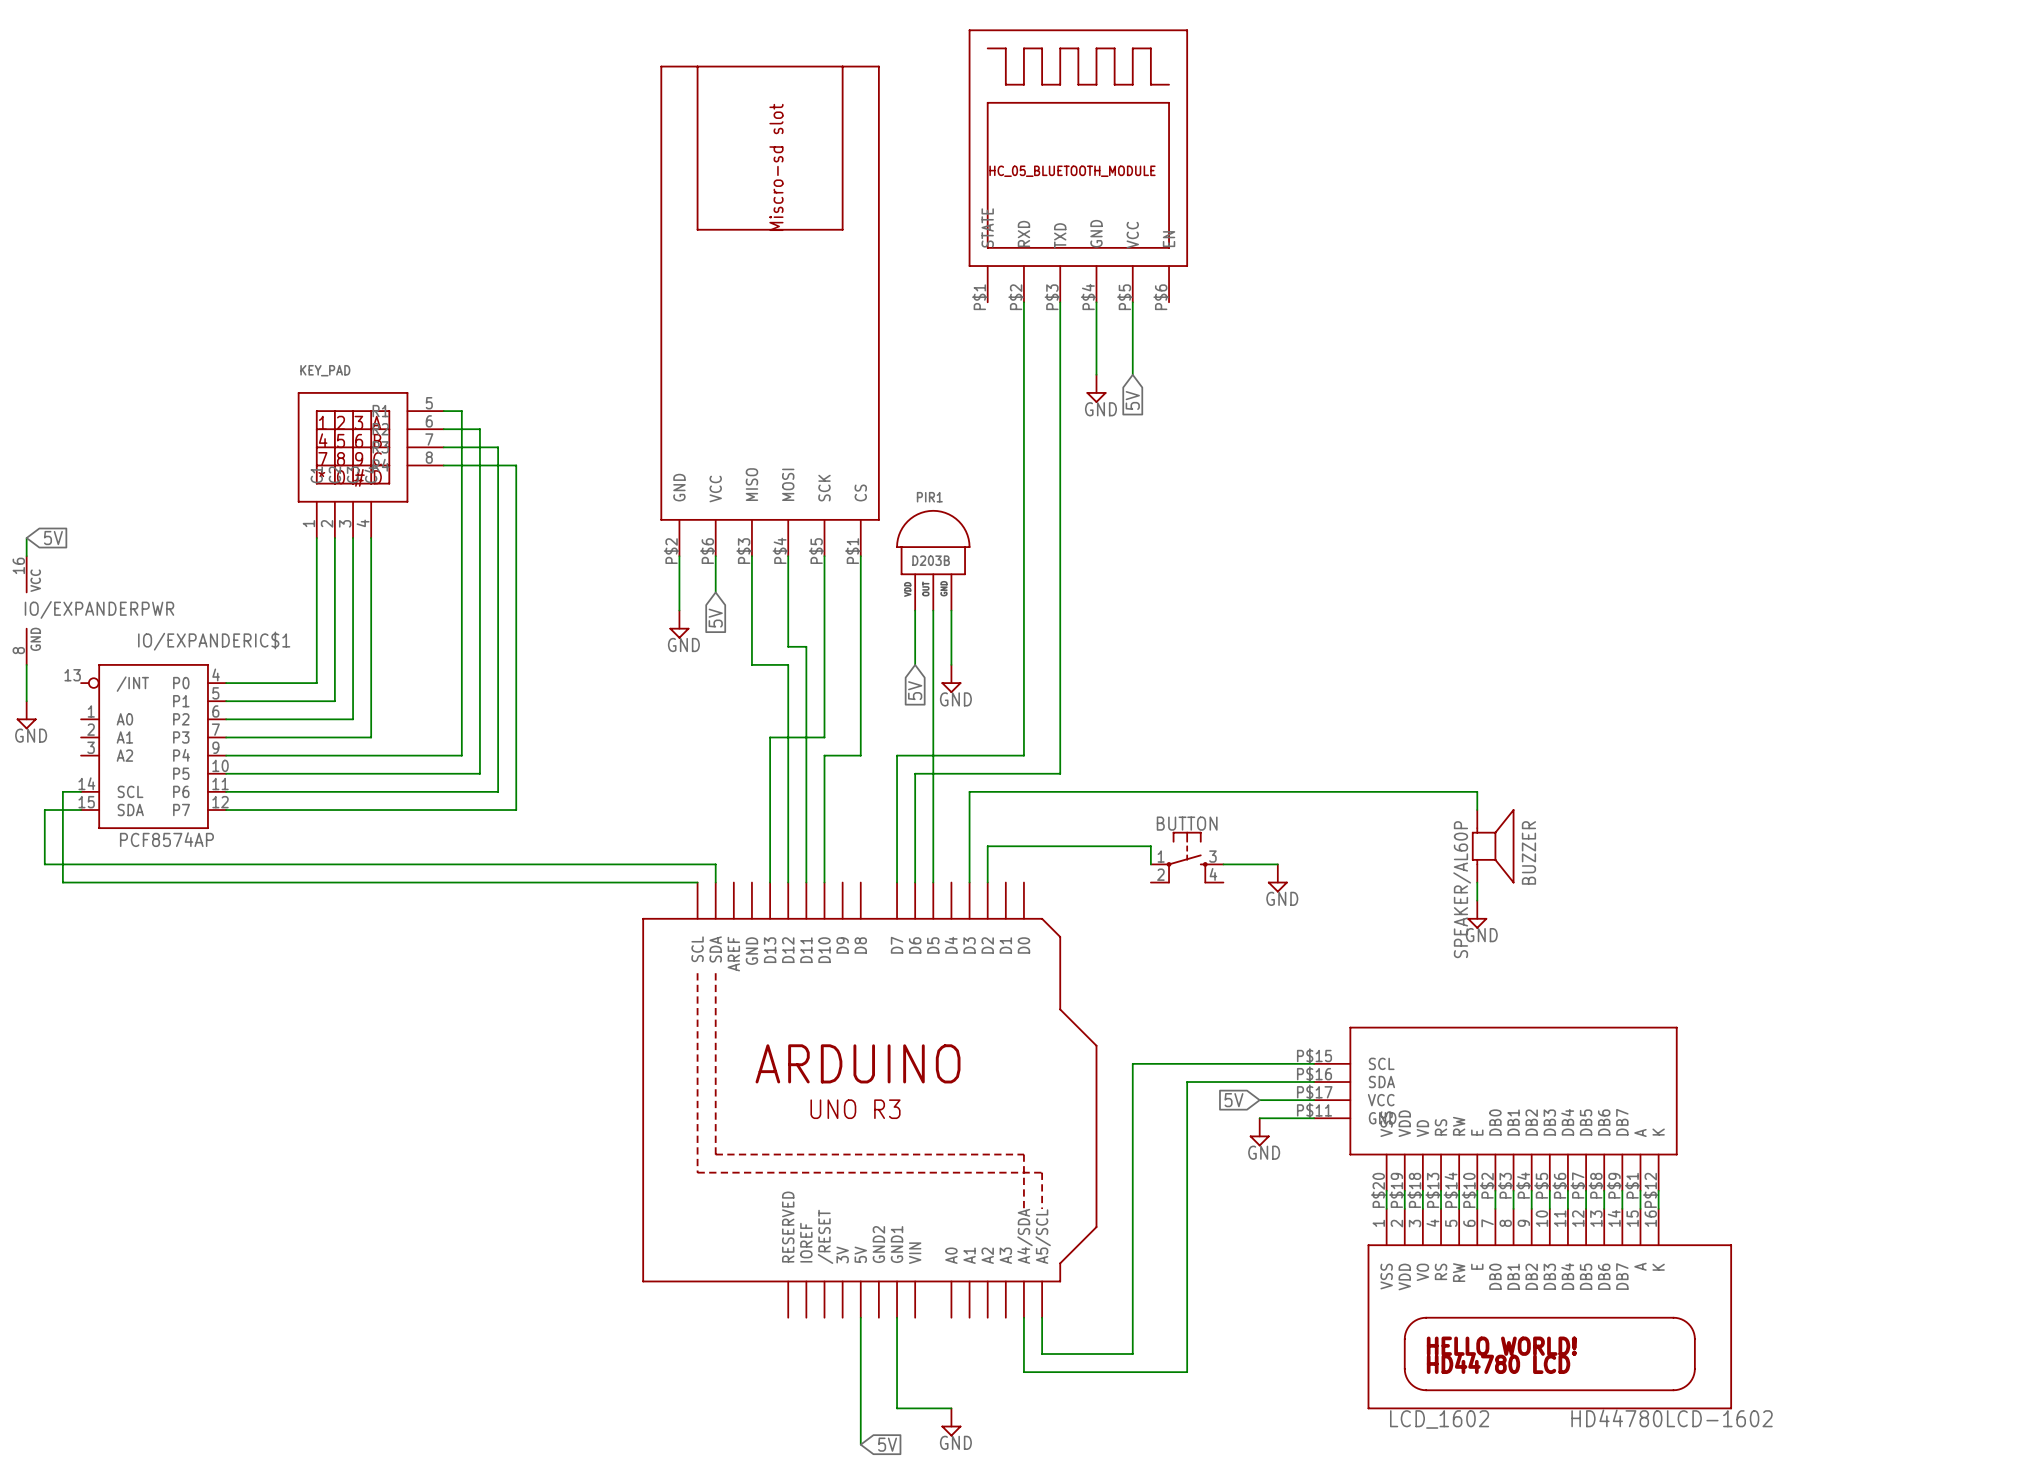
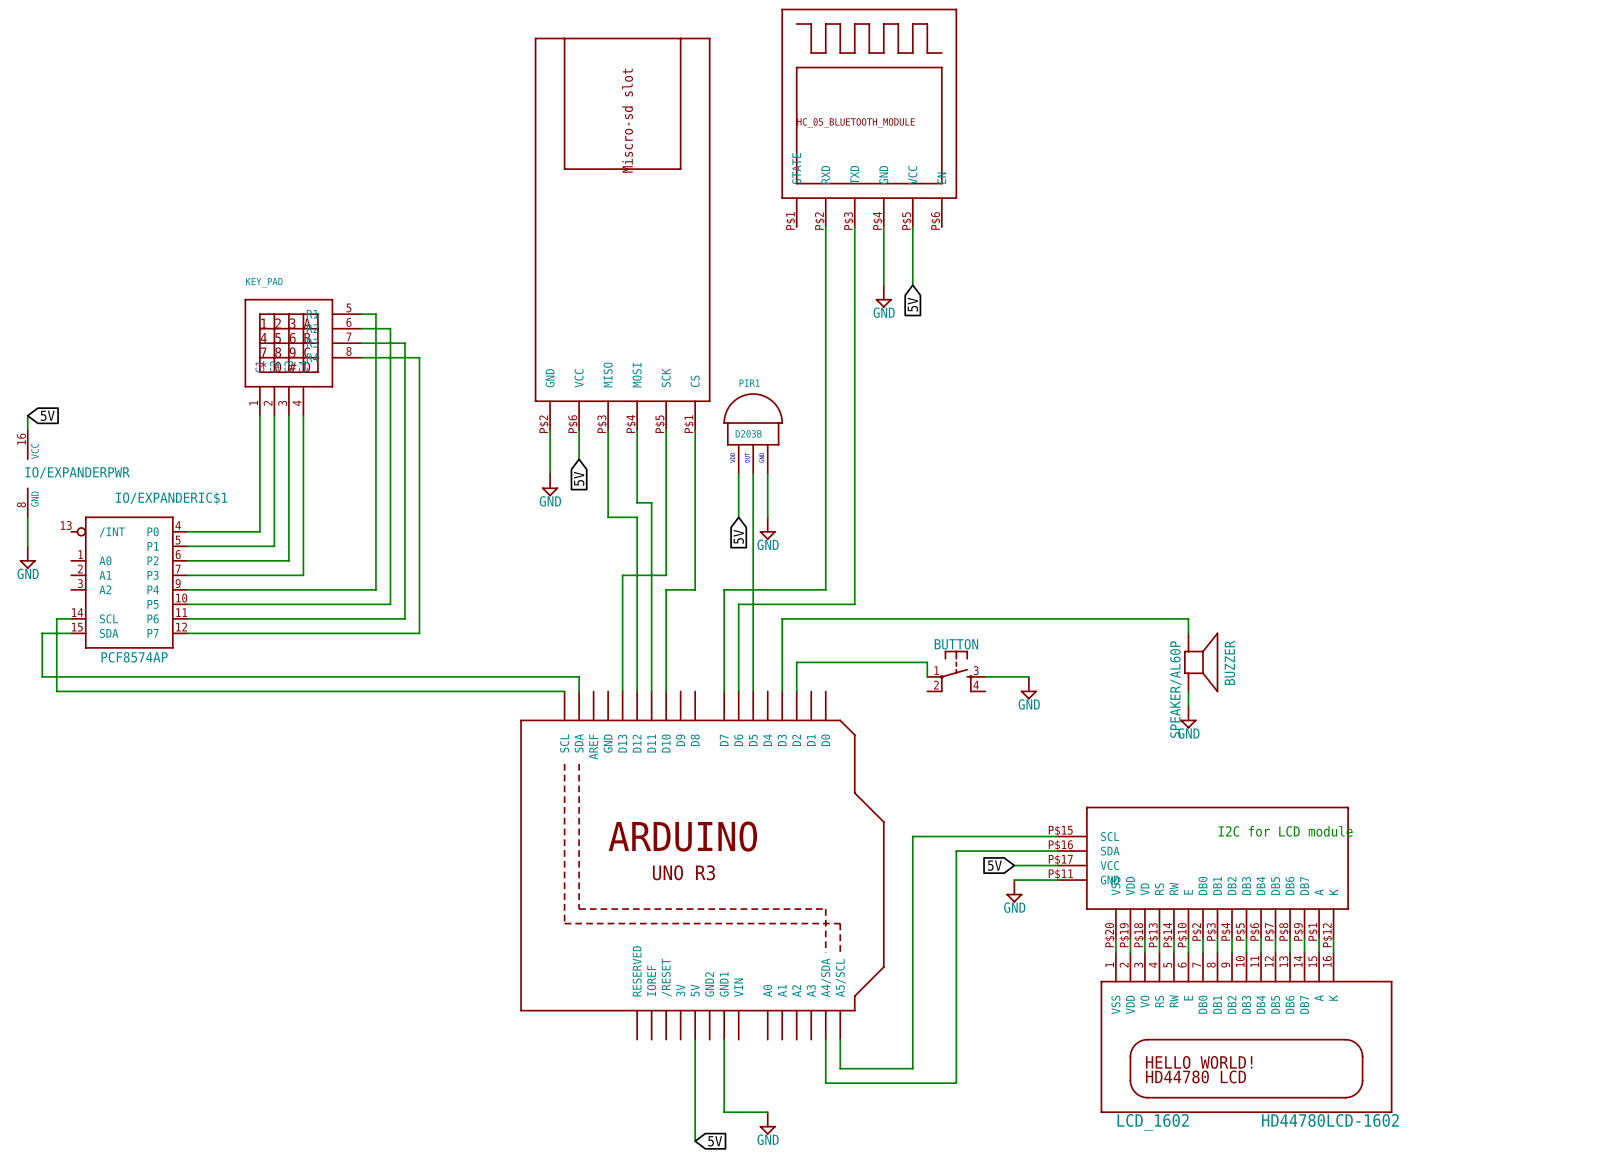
text: none -> I2C for LCD module (1285, 831)

